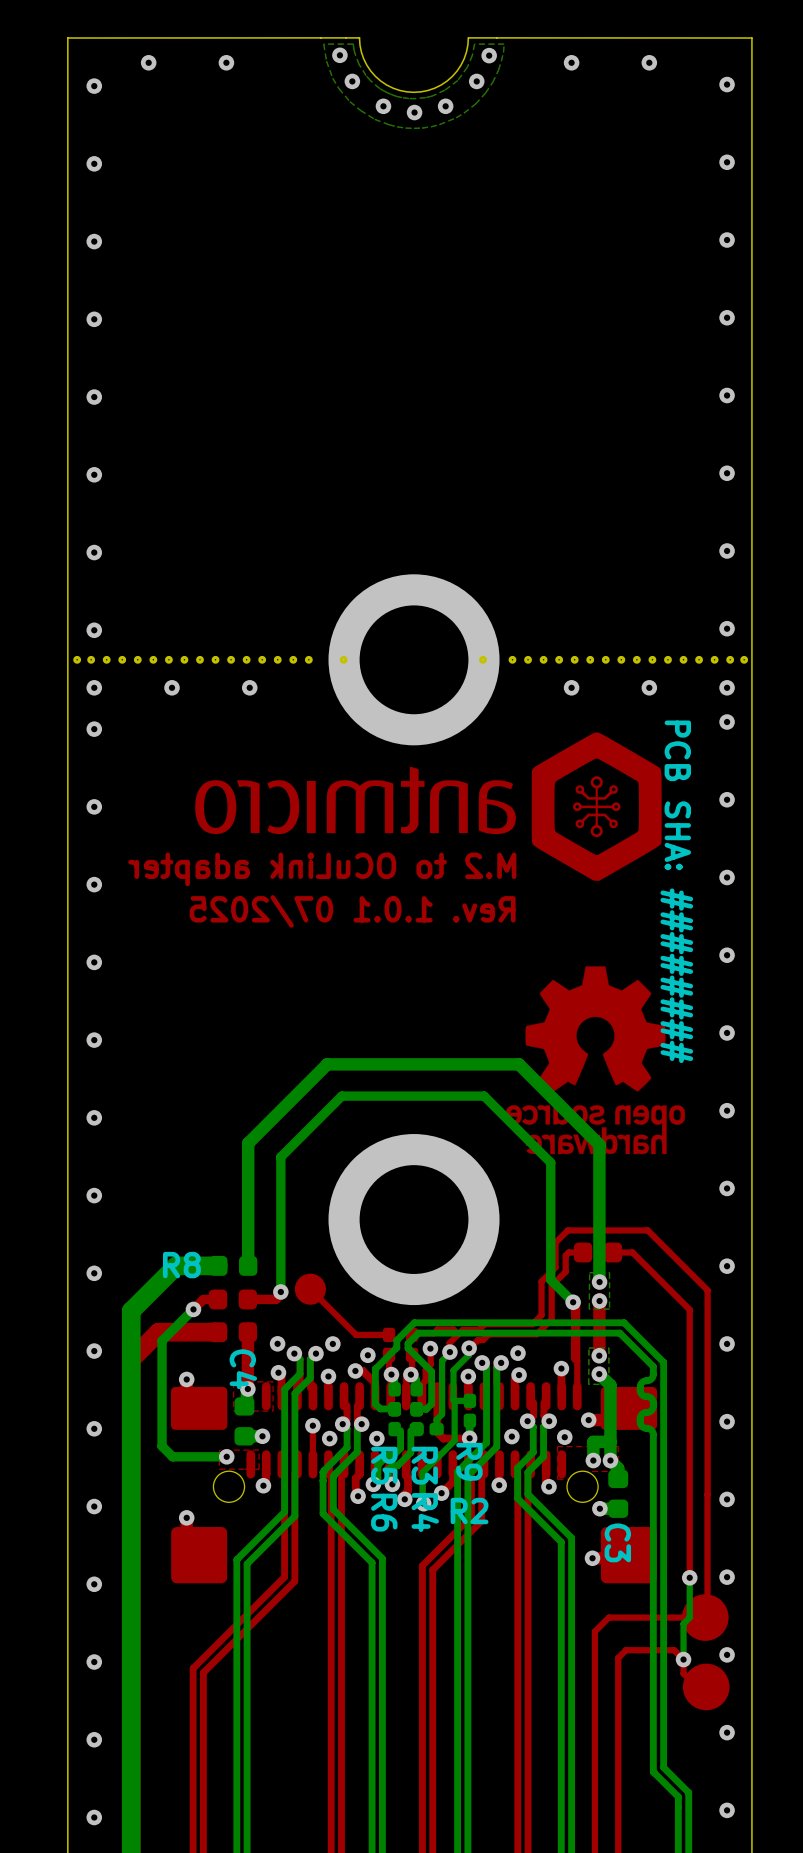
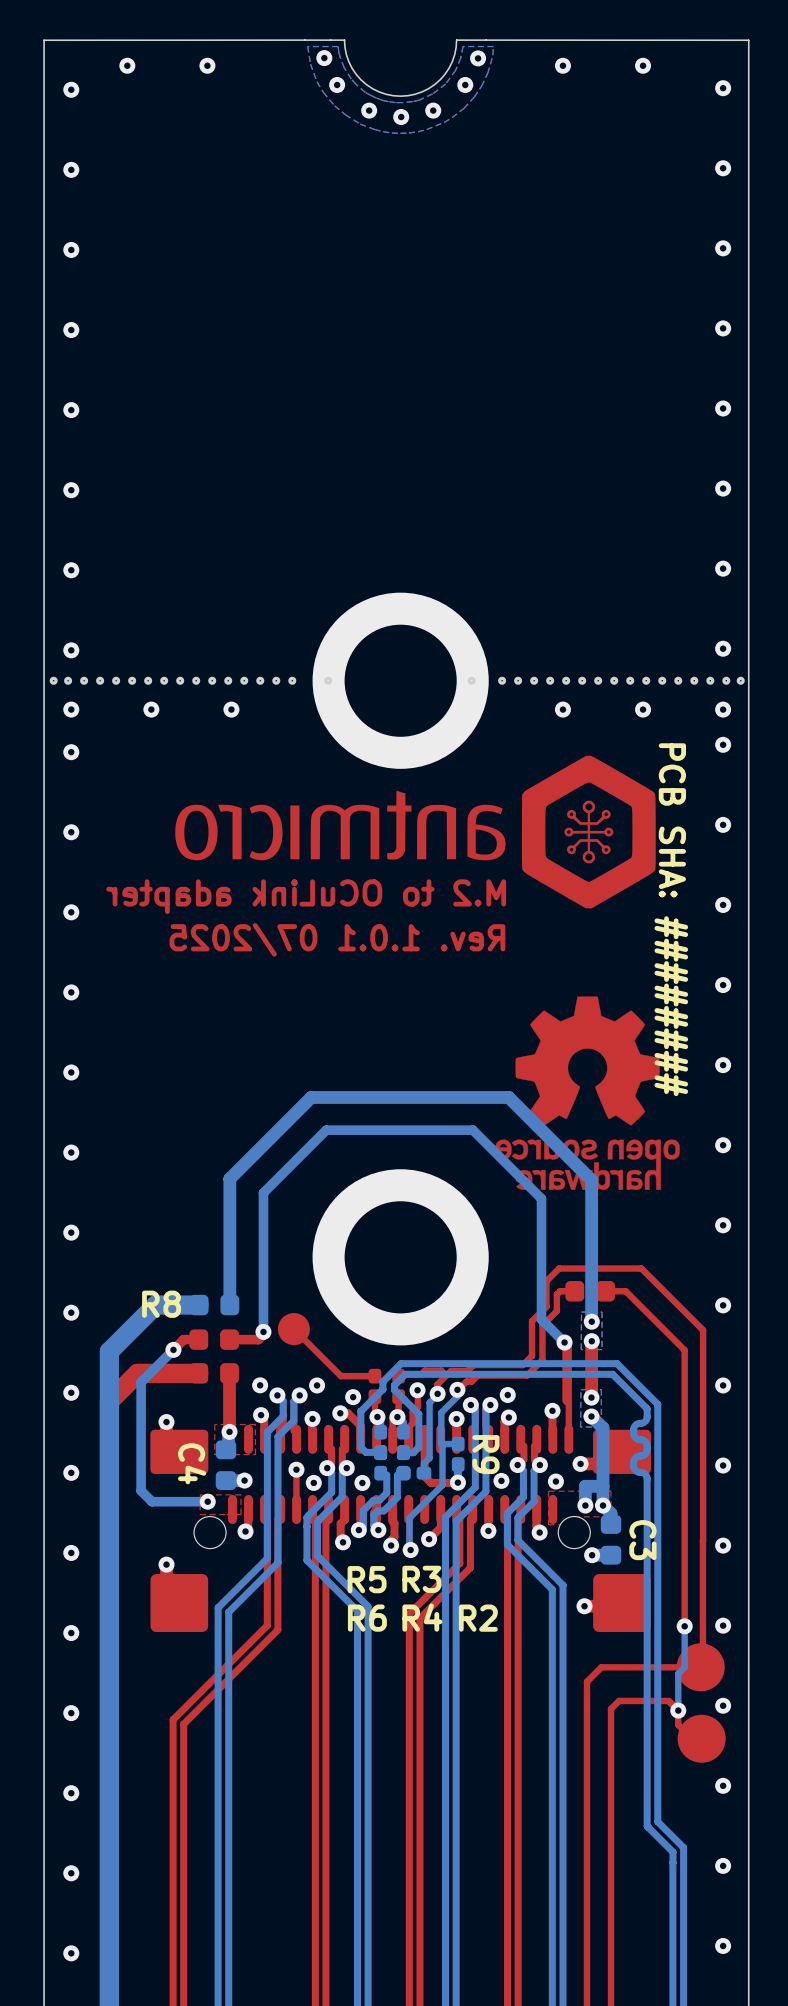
C4 name position: C4 (243, 1369) -> C4 (192, 1463)
R9 name position: R9 (469, 1461) -> R9 (485, 1454)
R5 name rotation: 0° (384, 1465) -> 90° counterclockwise (367, 1579)
R5 name position: R5 (384, 1465) -> R5 (367, 1579)
R3 name rotation: 0° (424, 1465) -> 90° counterclockwise (421, 1579)
R3 name position: R3 (424, 1465) -> R3 (421, 1579)
R2 name position: R2 (469, 1511) -> R2 (478, 1618)
R6 name rotation: 0° (384, 1512) -> 90° counterclockwise (367, 1618)
R6 name position: R6 (384, 1512) -> R6 (367, 1618)
R4 name rotation: 0° (425, 1512) -> 90° counterclockwise (422, 1617)
R4 name position: R4 (425, 1512) -> R4 (422, 1617)
C3 name position: C3 (617, 1542) -> C3 (642, 1540)

